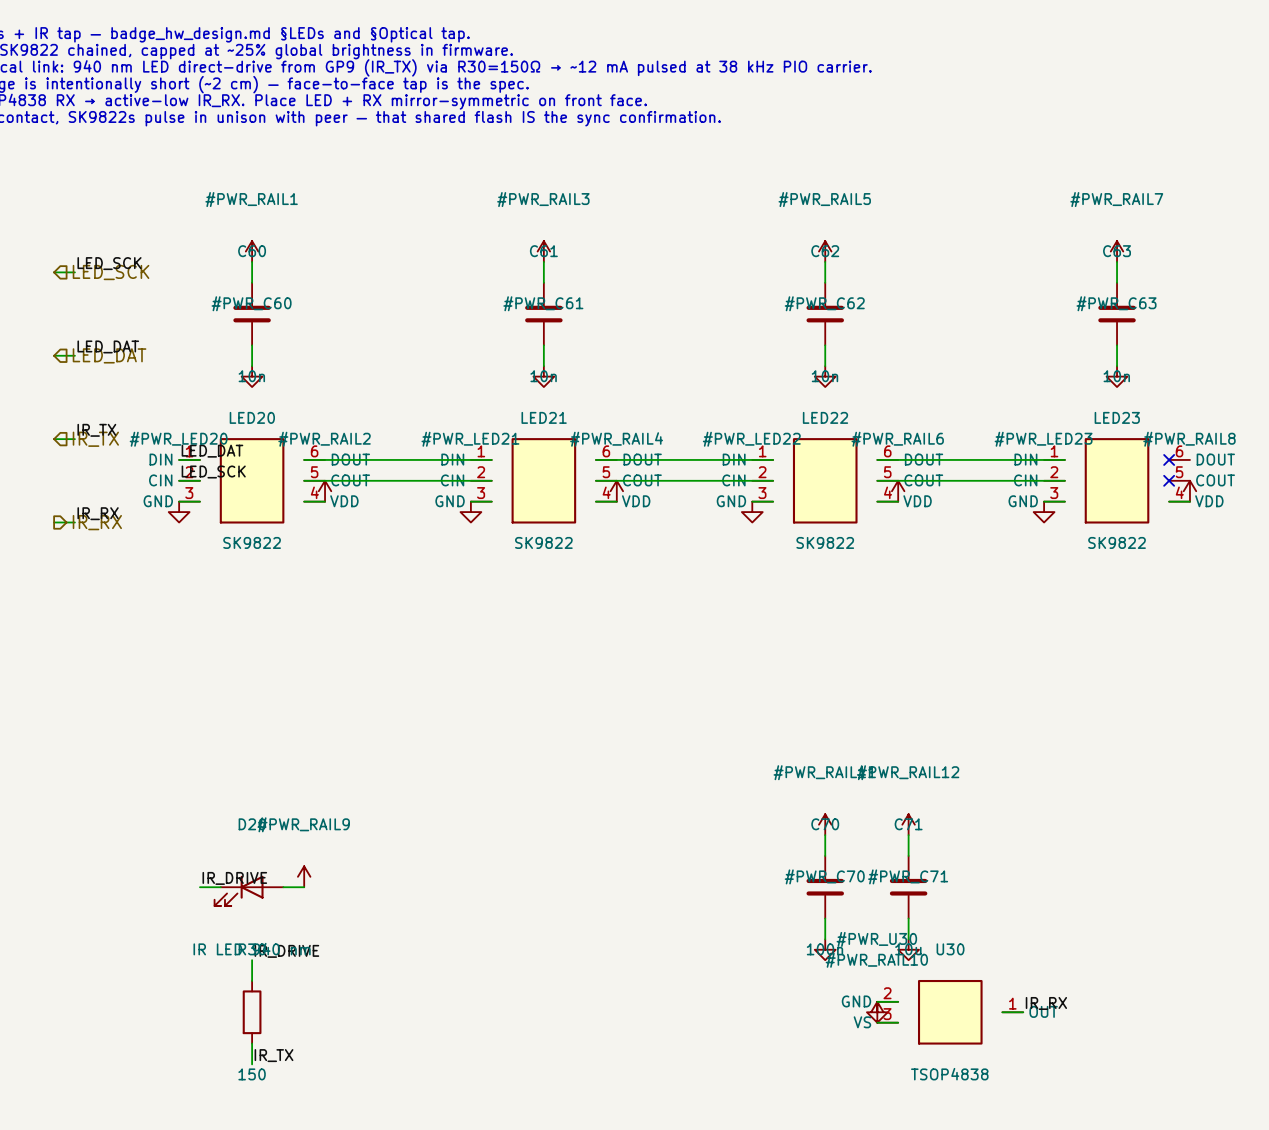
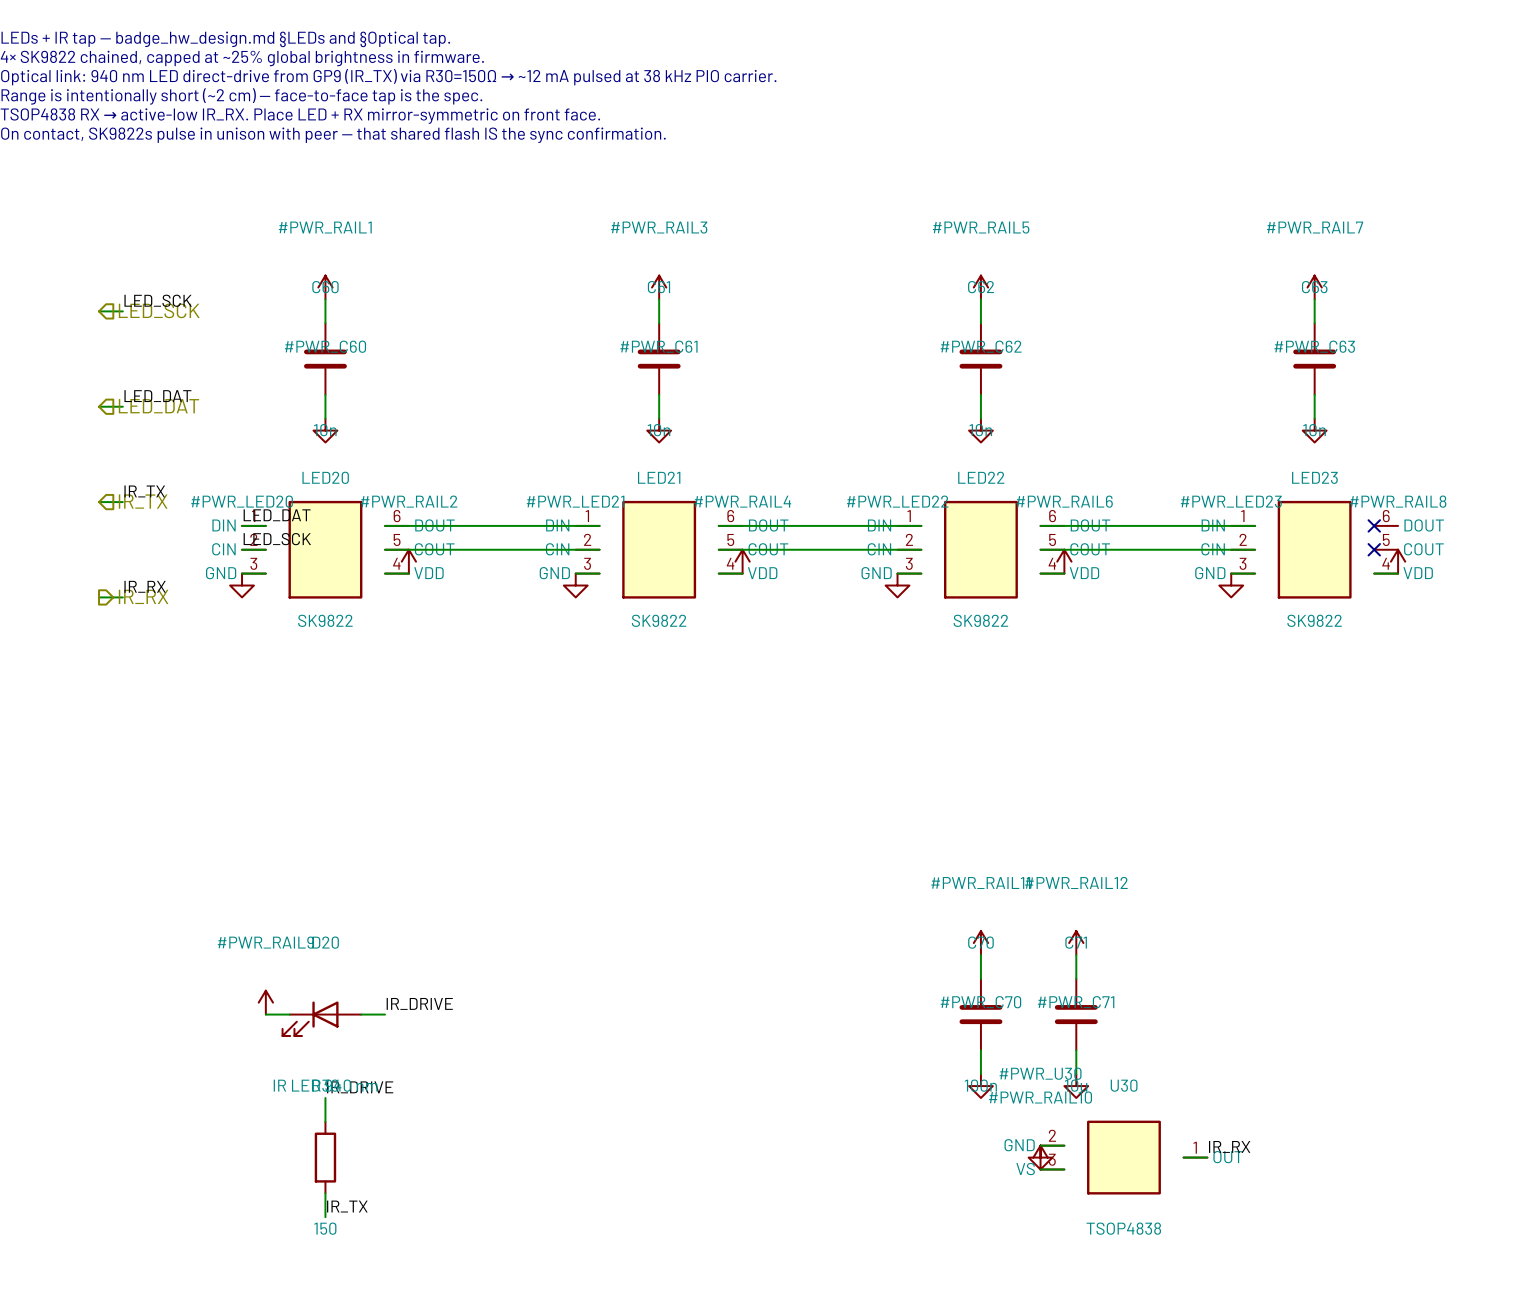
#PWR_RAIL9 position: (304, 876) -> (265, 1002)
label position: IR_DRIVE (234, 878) -> IR_DRIVE (419, 1003)

